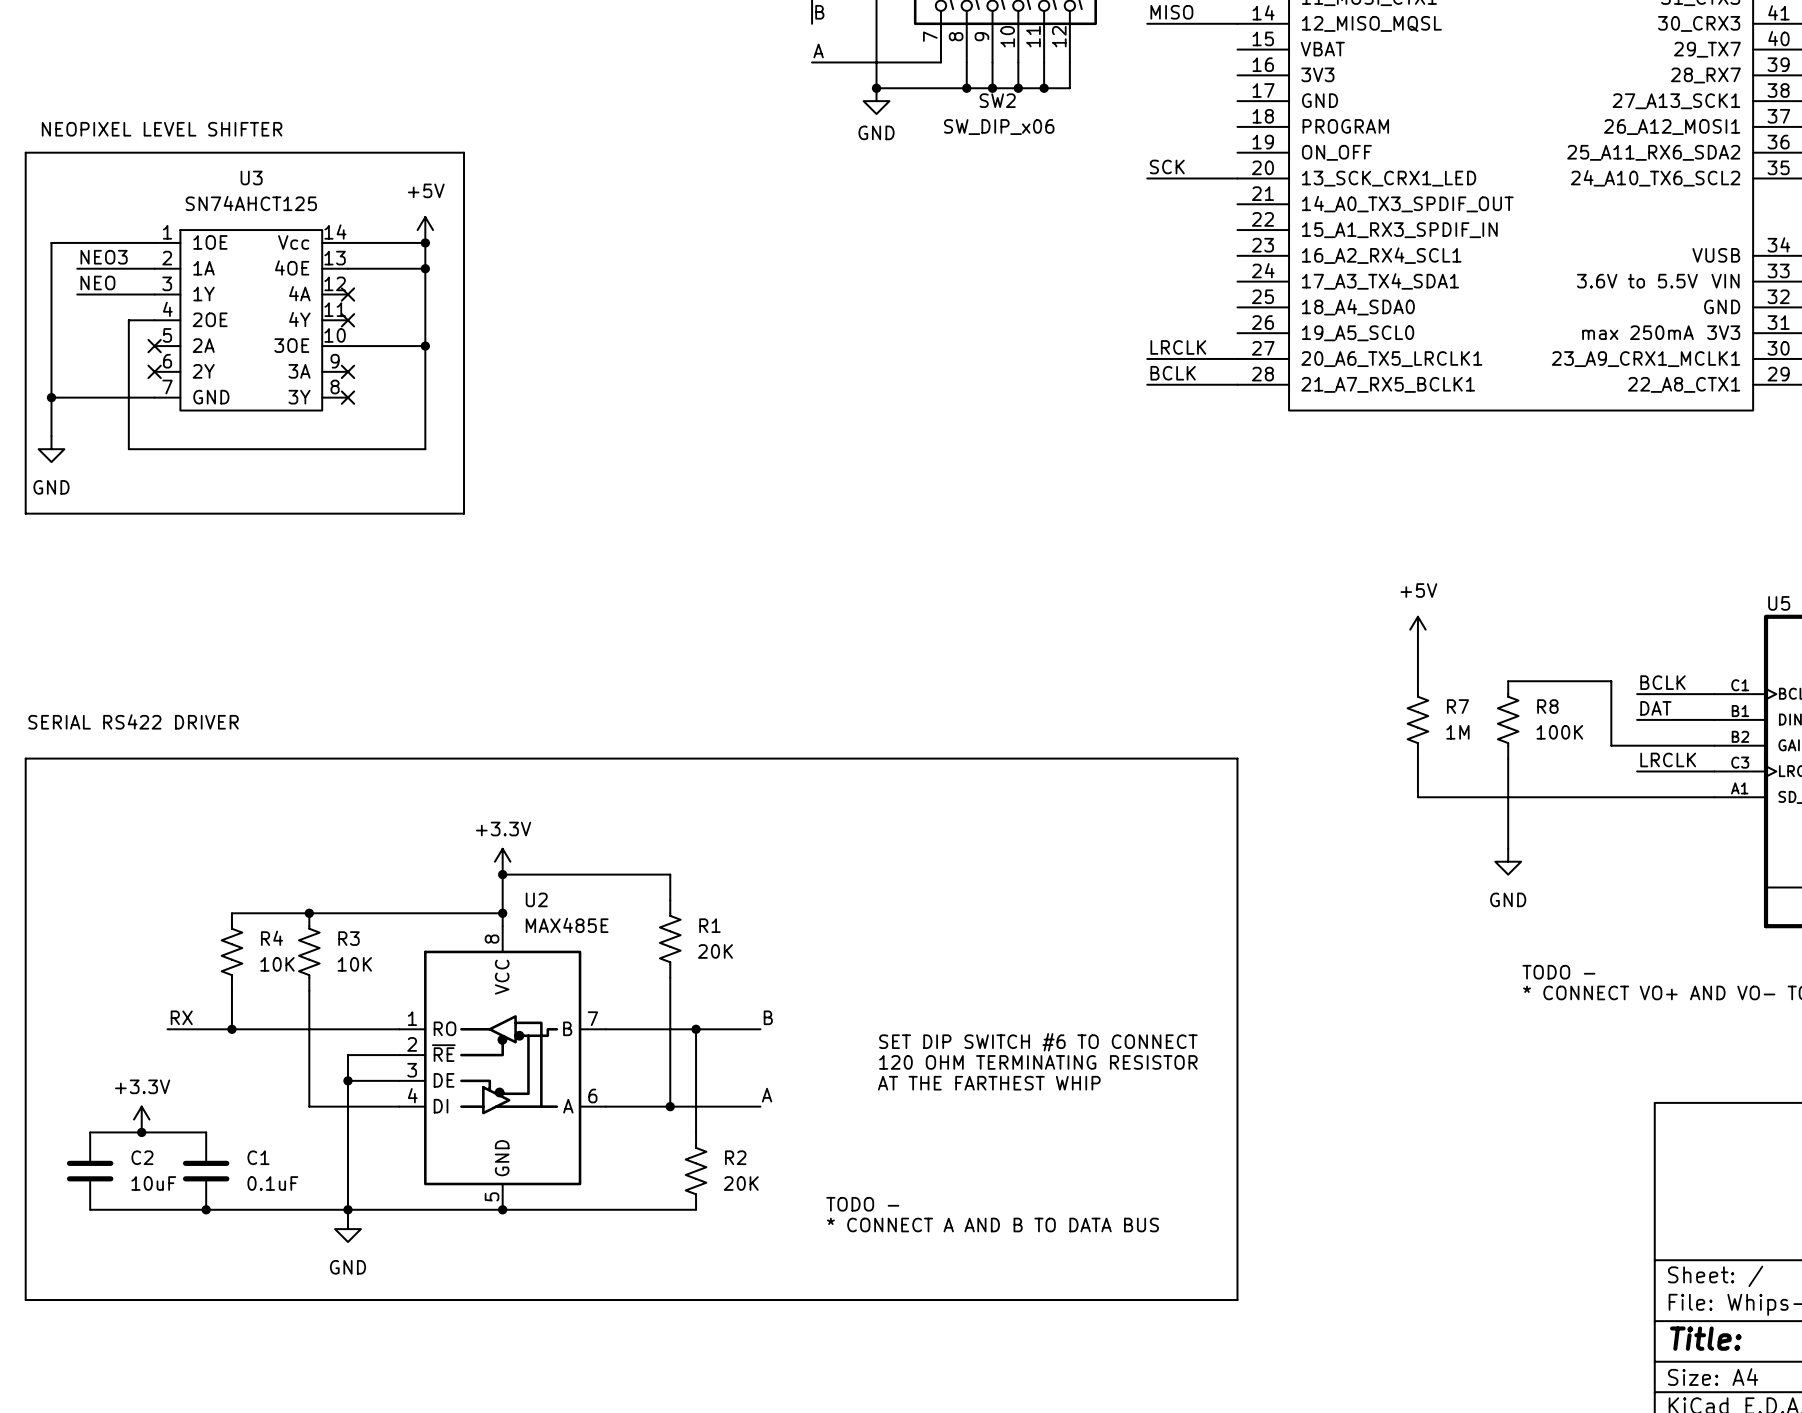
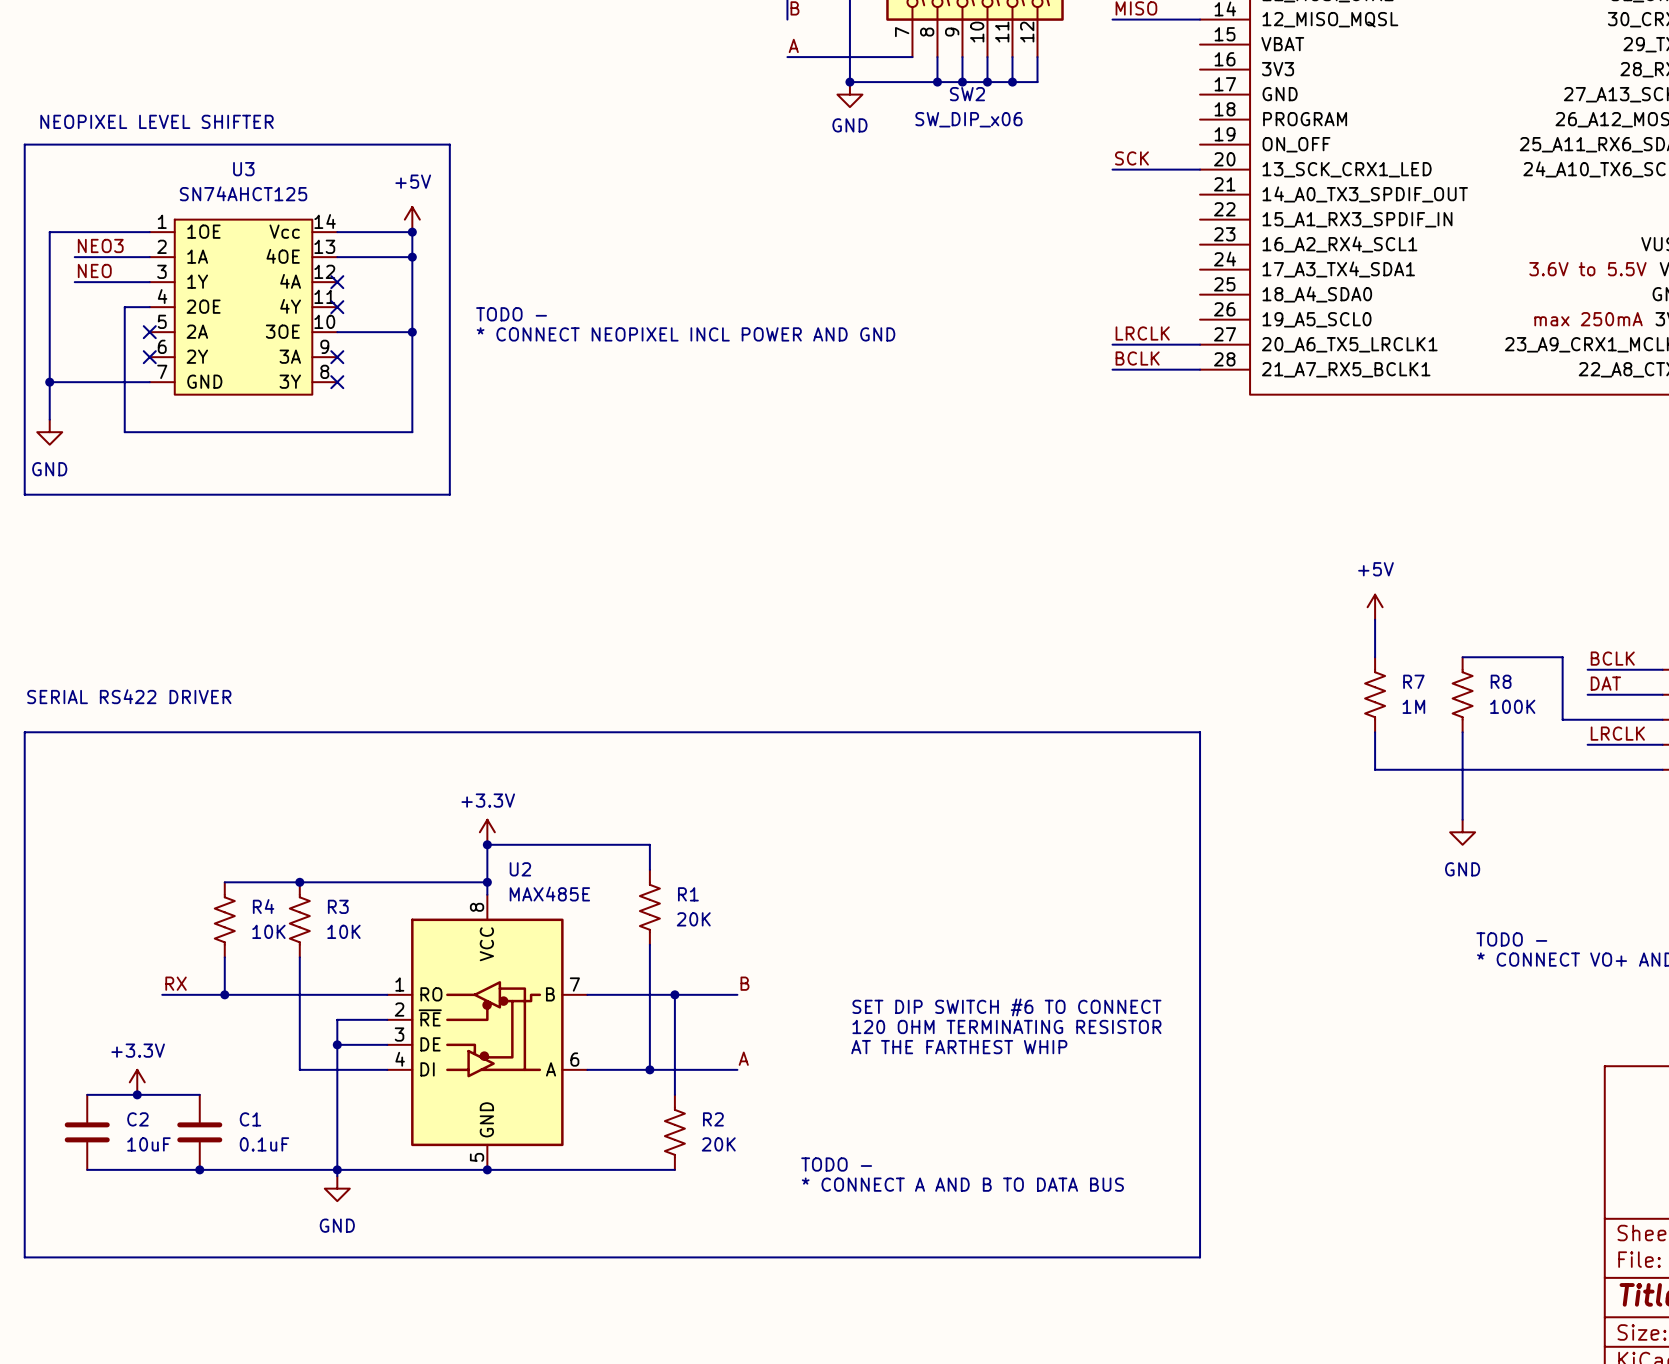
text: none -> TODO - (511, 314)
text: none -> * CONNECT NEOPIXEL INCL POWER AND GND (686, 334)

